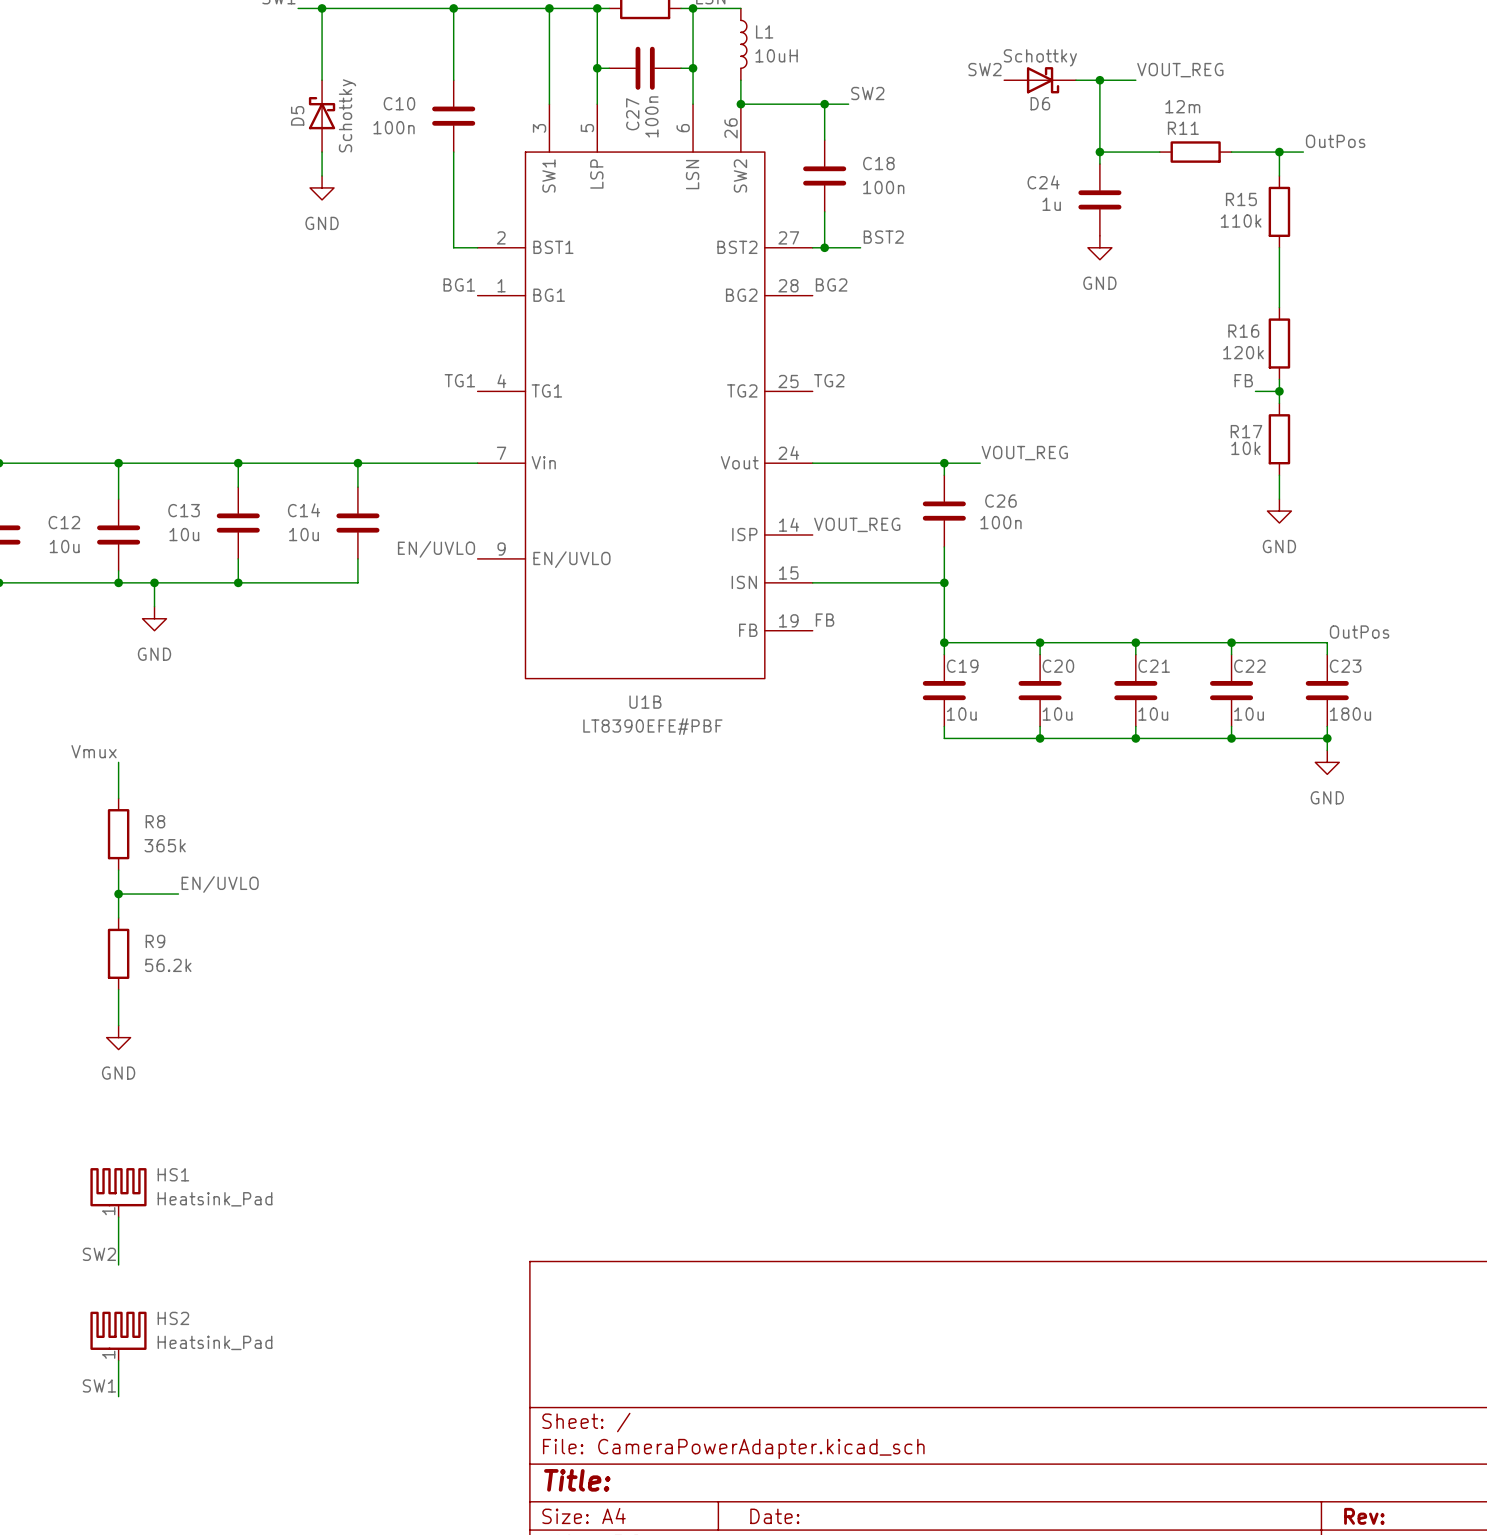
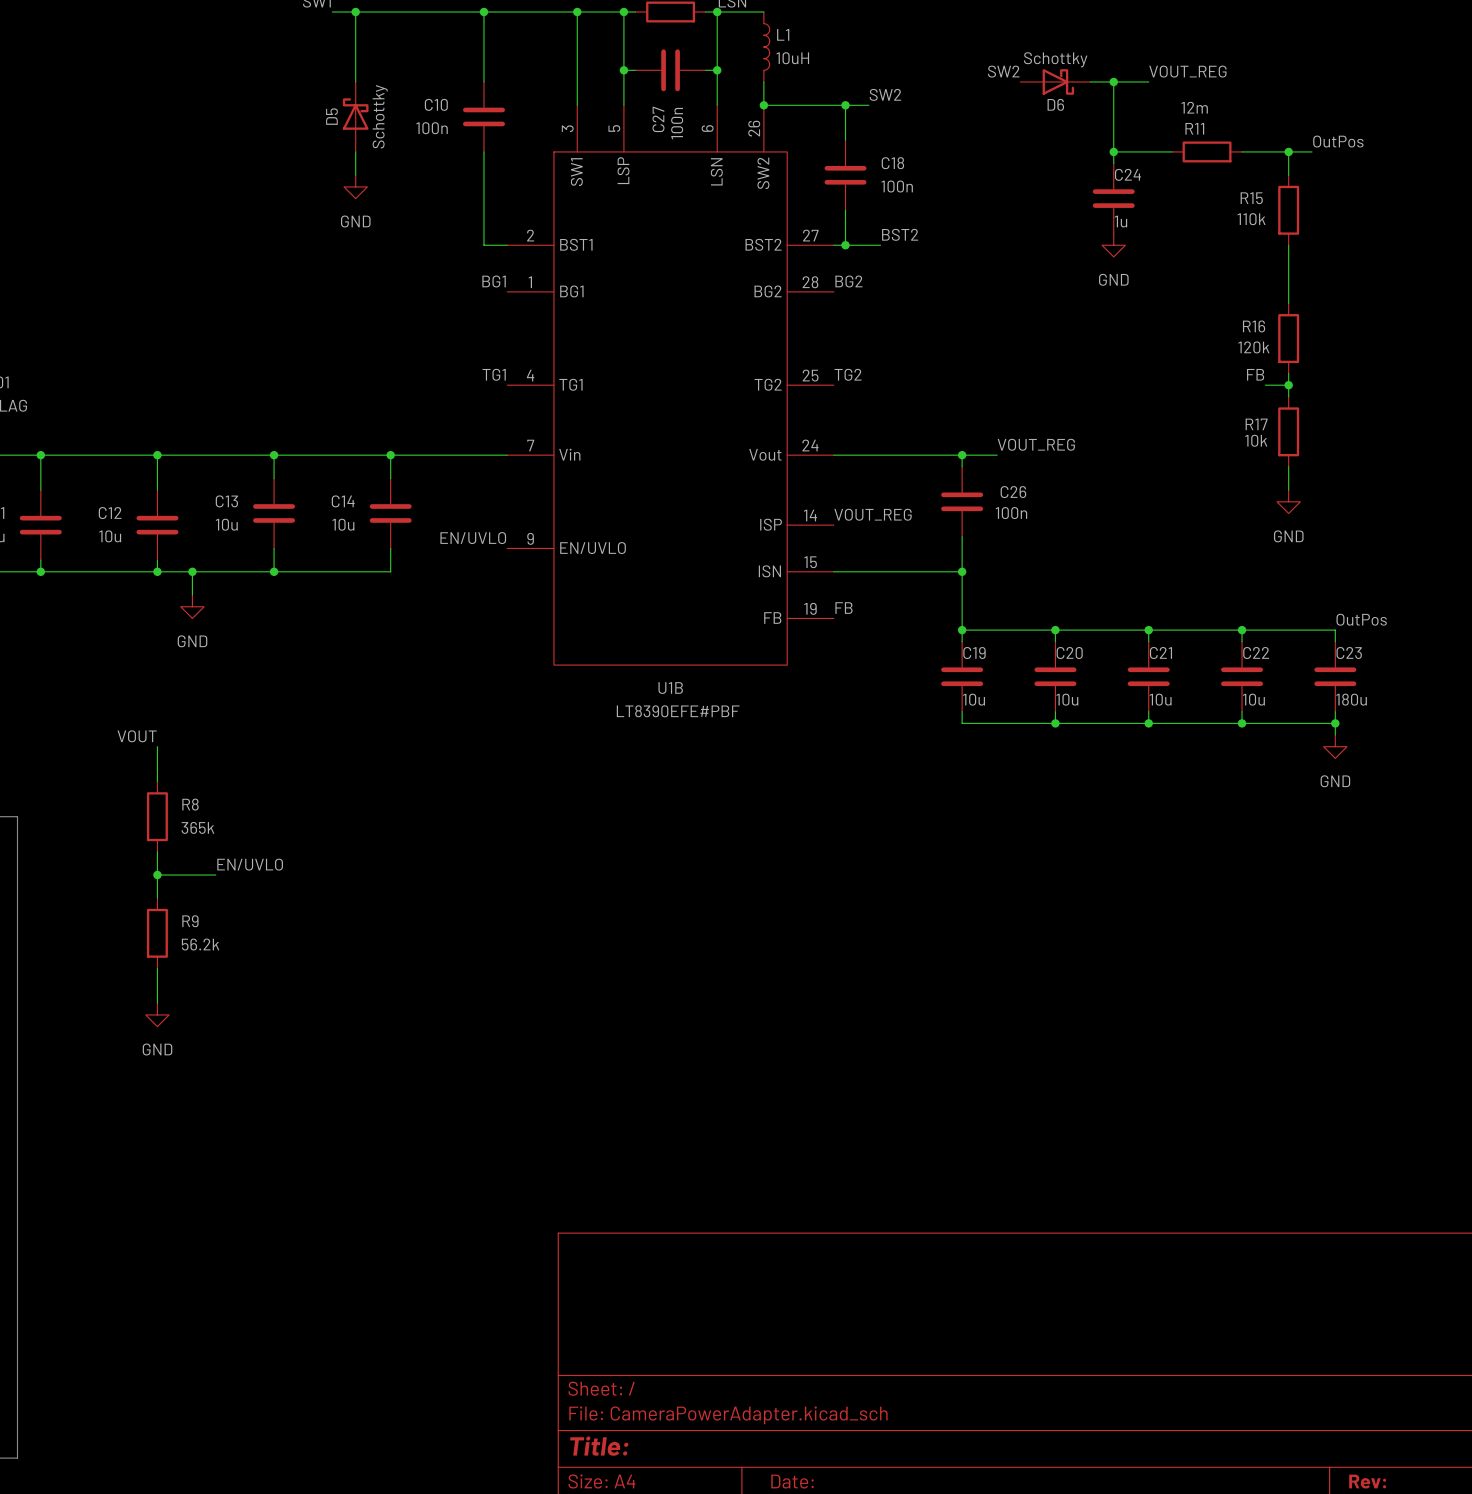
C24 name position: C24 (1043, 182) -> C24 (1127, 174)
C24 value position: 1u (1051, 204) -> 1u (1120, 221)
label: Vmux (94, 751) -> VOUT (137, 736)
HS1: Heatsink_Pad (118, 1192) -> none
wire: (118, 1217) (118, 1264) -> none
label: SW2 (99, 1254) -> none
HS2: Heatsink_Pad (118, 1336) -> none
wire: (118, 1360) (118, 1396) -> none
label: SW1 (99, 1385) -> none

